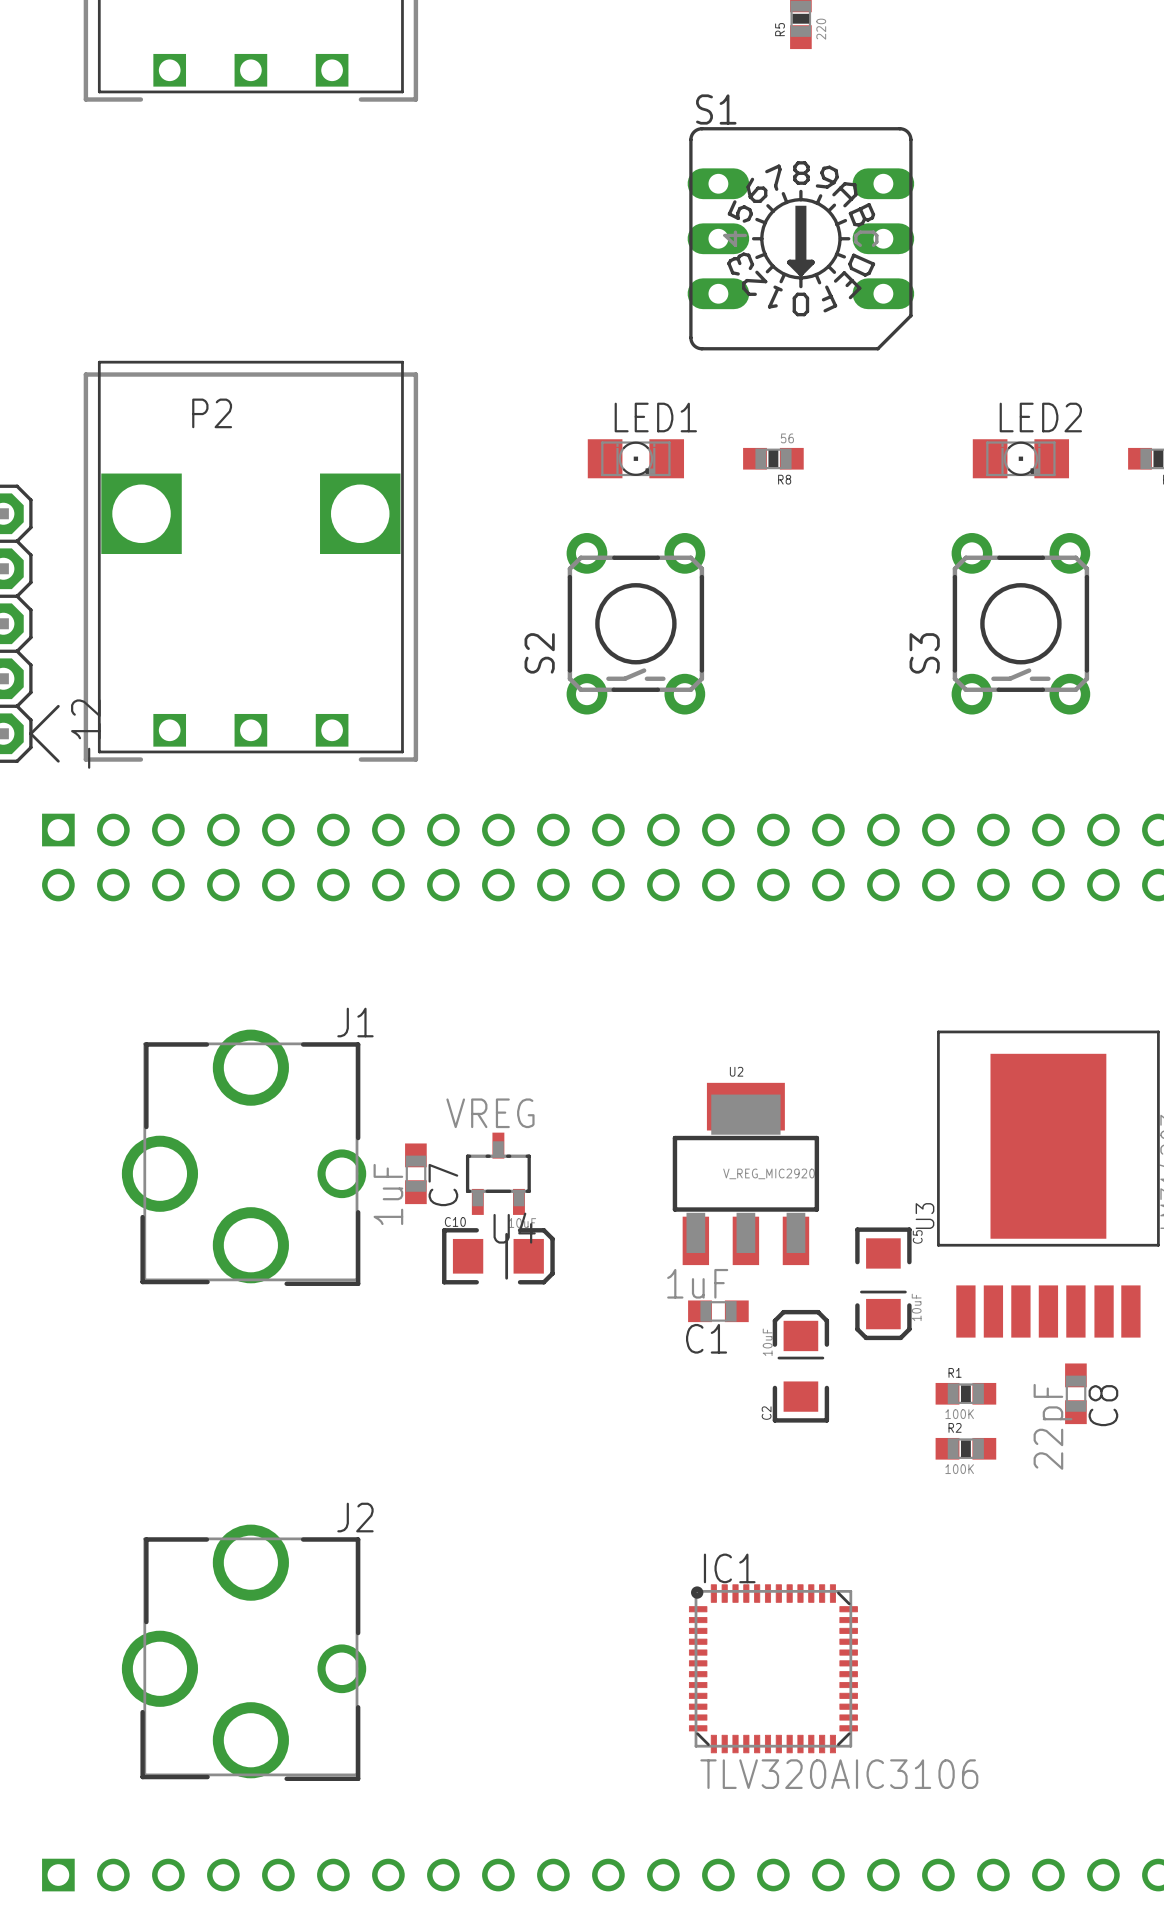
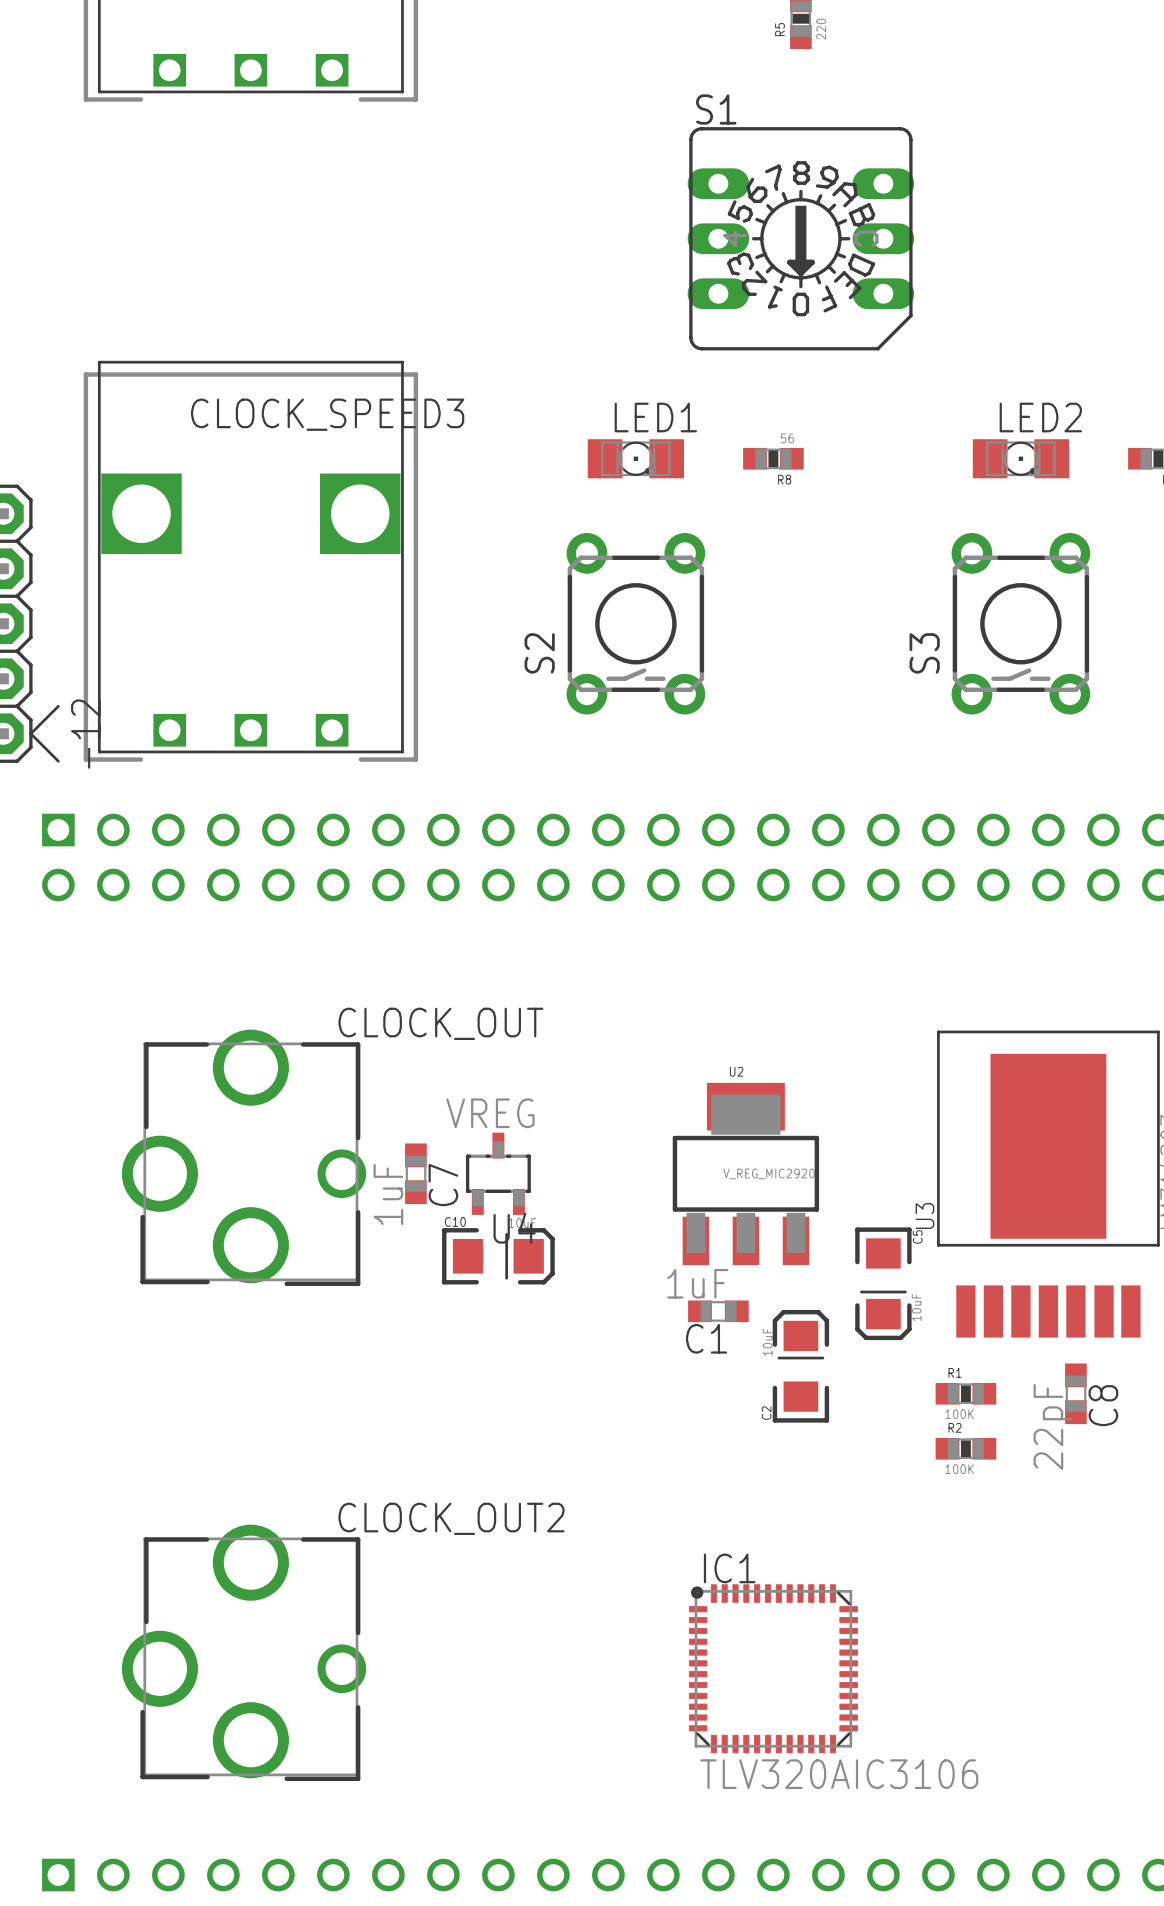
P2 name: P2 (212, 413) -> CLOCK_SPEED3 (327, 414)
J1 name: J1 (355, 1022) -> CLOCK_OUT (440, 1023)
J2 name: J2 (355, 1517) -> CLOCK_OUT2 (451, 1518)

